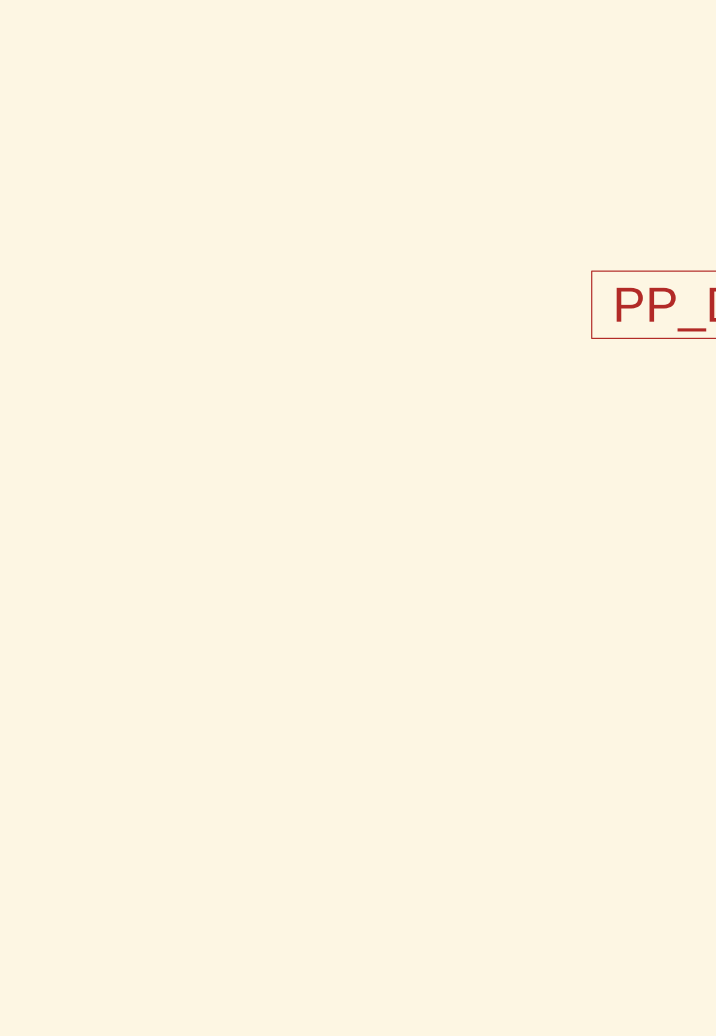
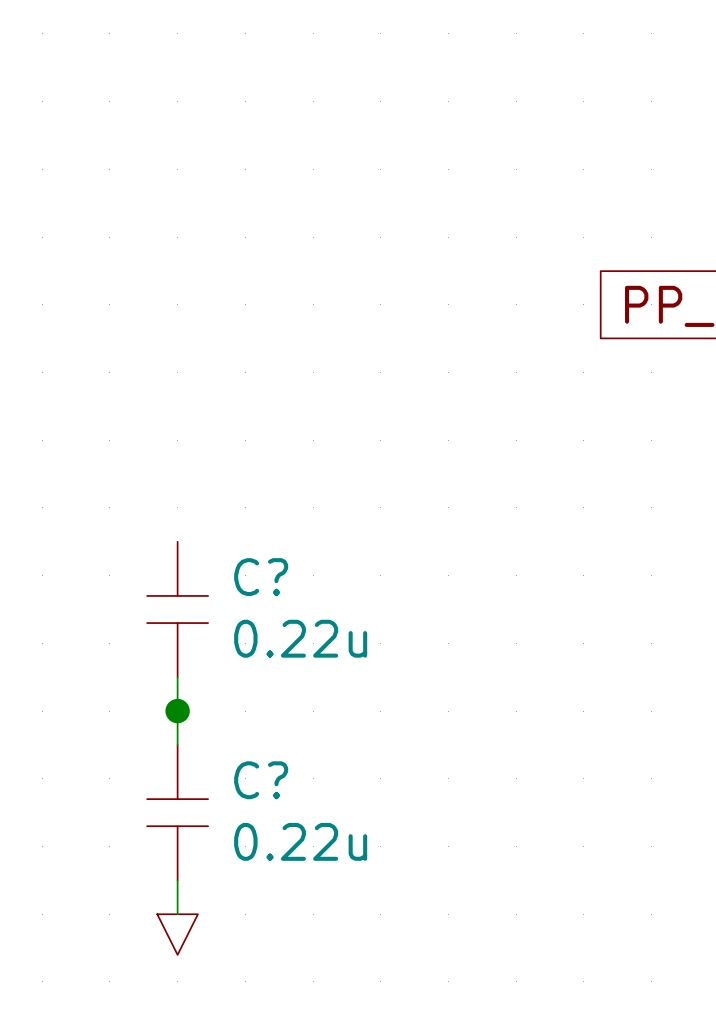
C?: none -> 0.22u (177, 609)
wire: none -> (177, 677) (177, 744)
junction: none -> (177, 711)
C?: none -> 0.22u (177, 812)
wire: none -> (177, 880) (177, 914)
power symbol: none -> (177, 934)

